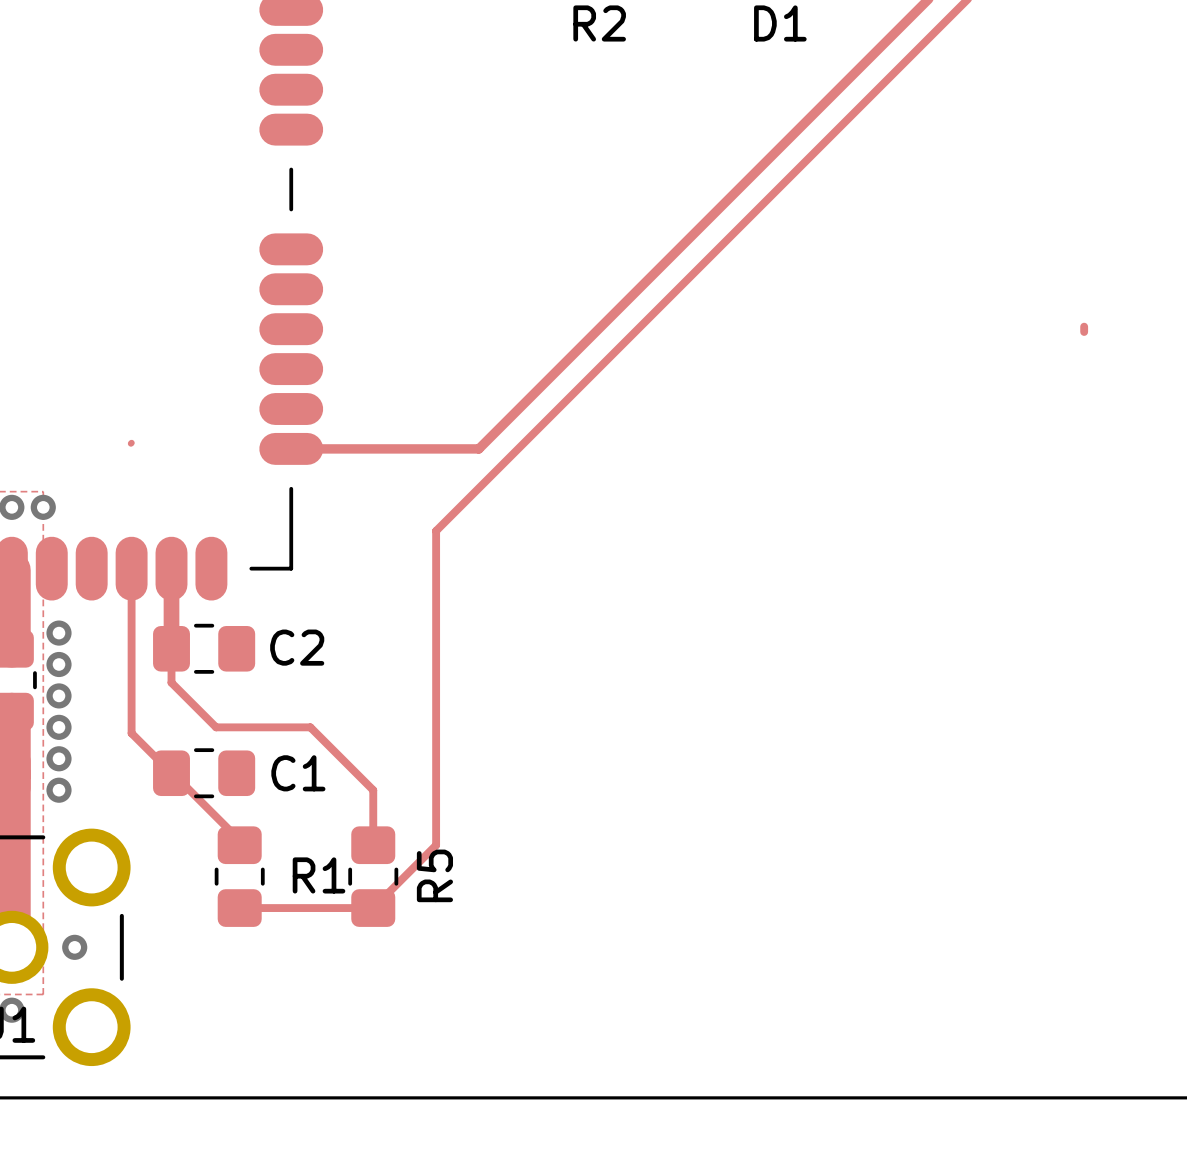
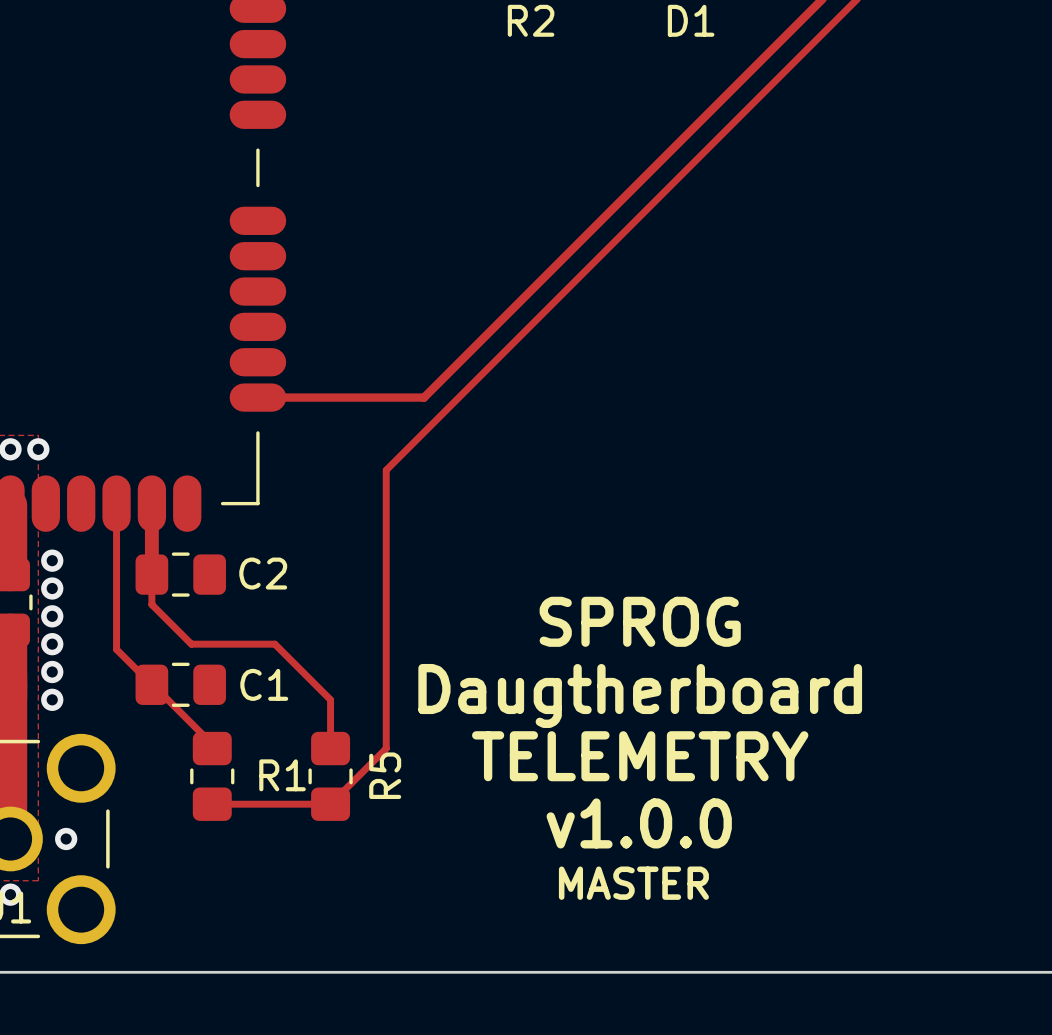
top track: (1084, 326) (1084, 331) -> none
top track: (131, 442) (130, 443) -> none
text: none -> SPROG (640, 621)
text: none -> Daugtherboard (640, 695)
text: none -> TELEMETRY (640, 756)
text: none -> v1.0.0 (639, 823)
text: none -> MASTER (633, 883)

